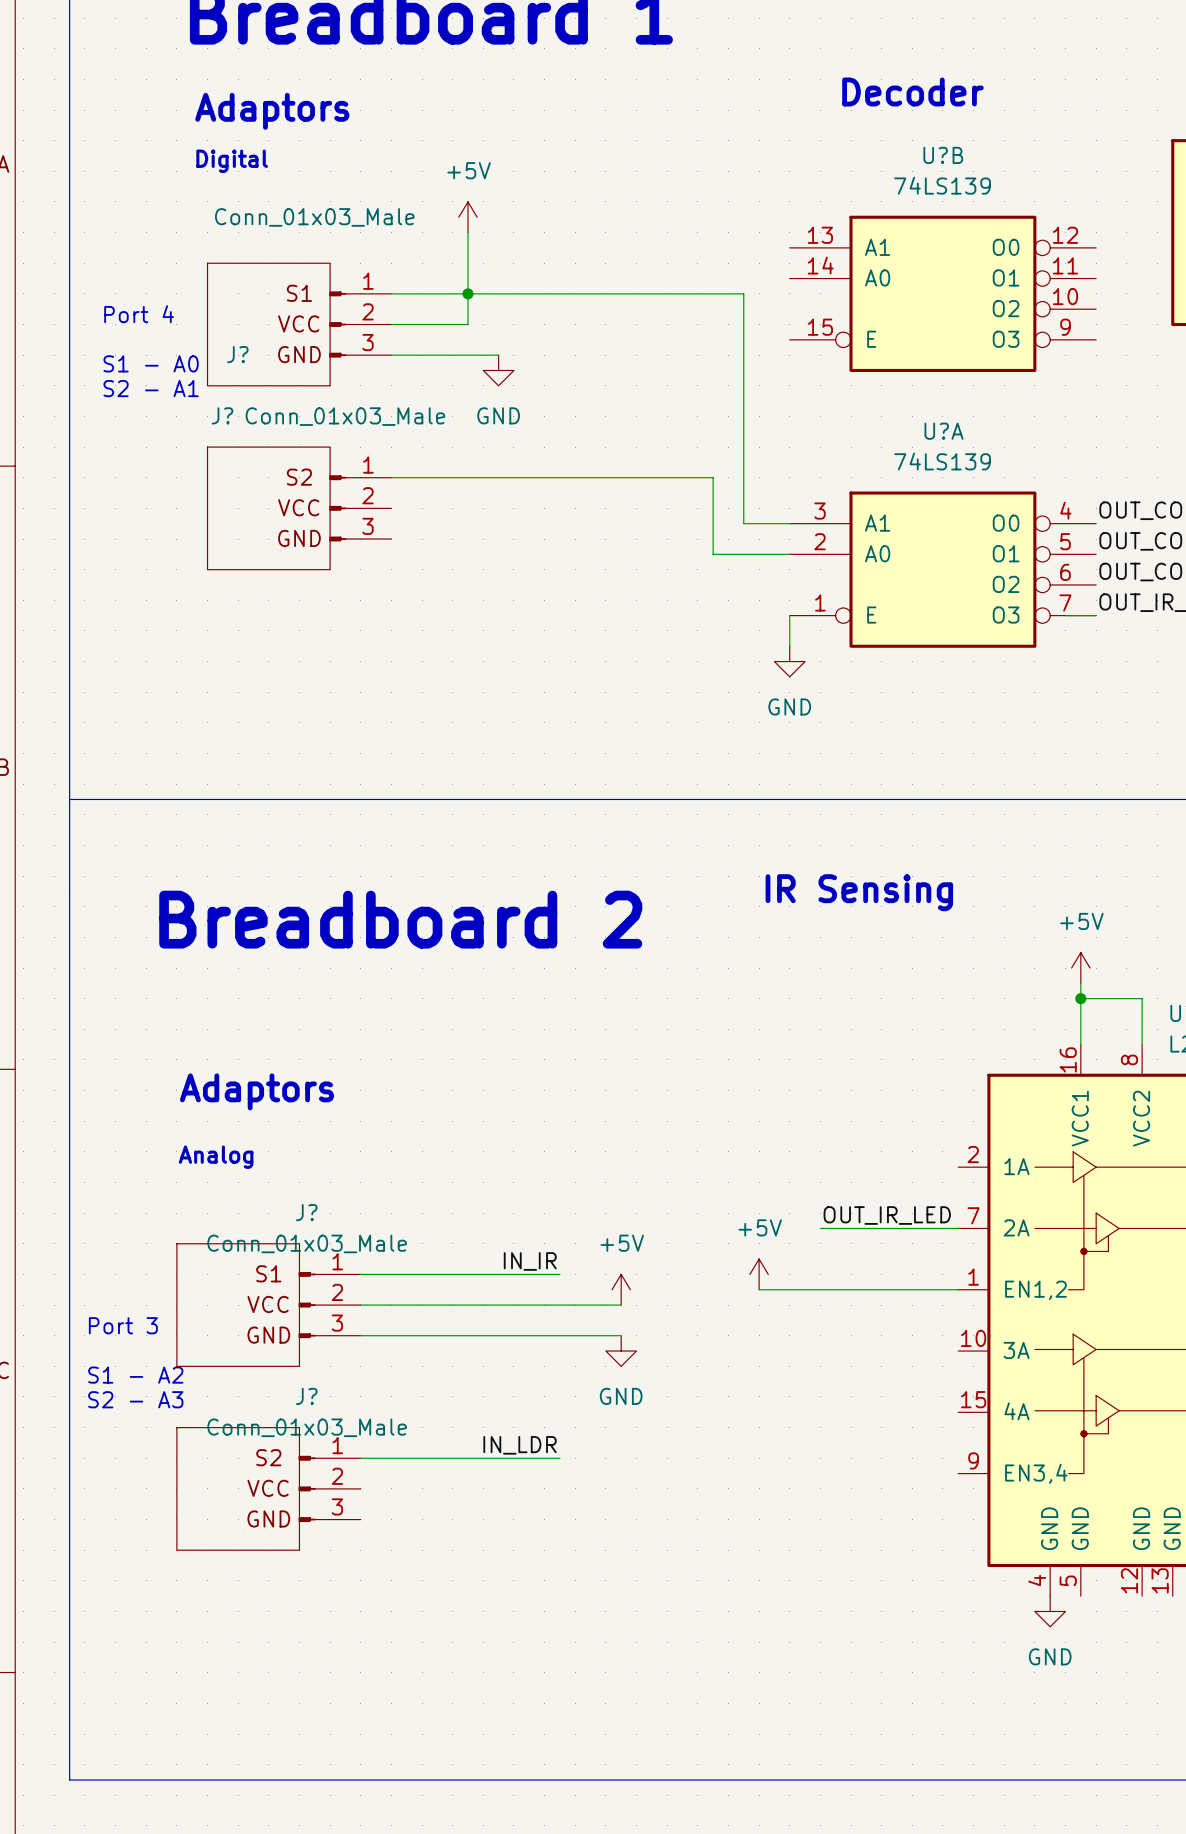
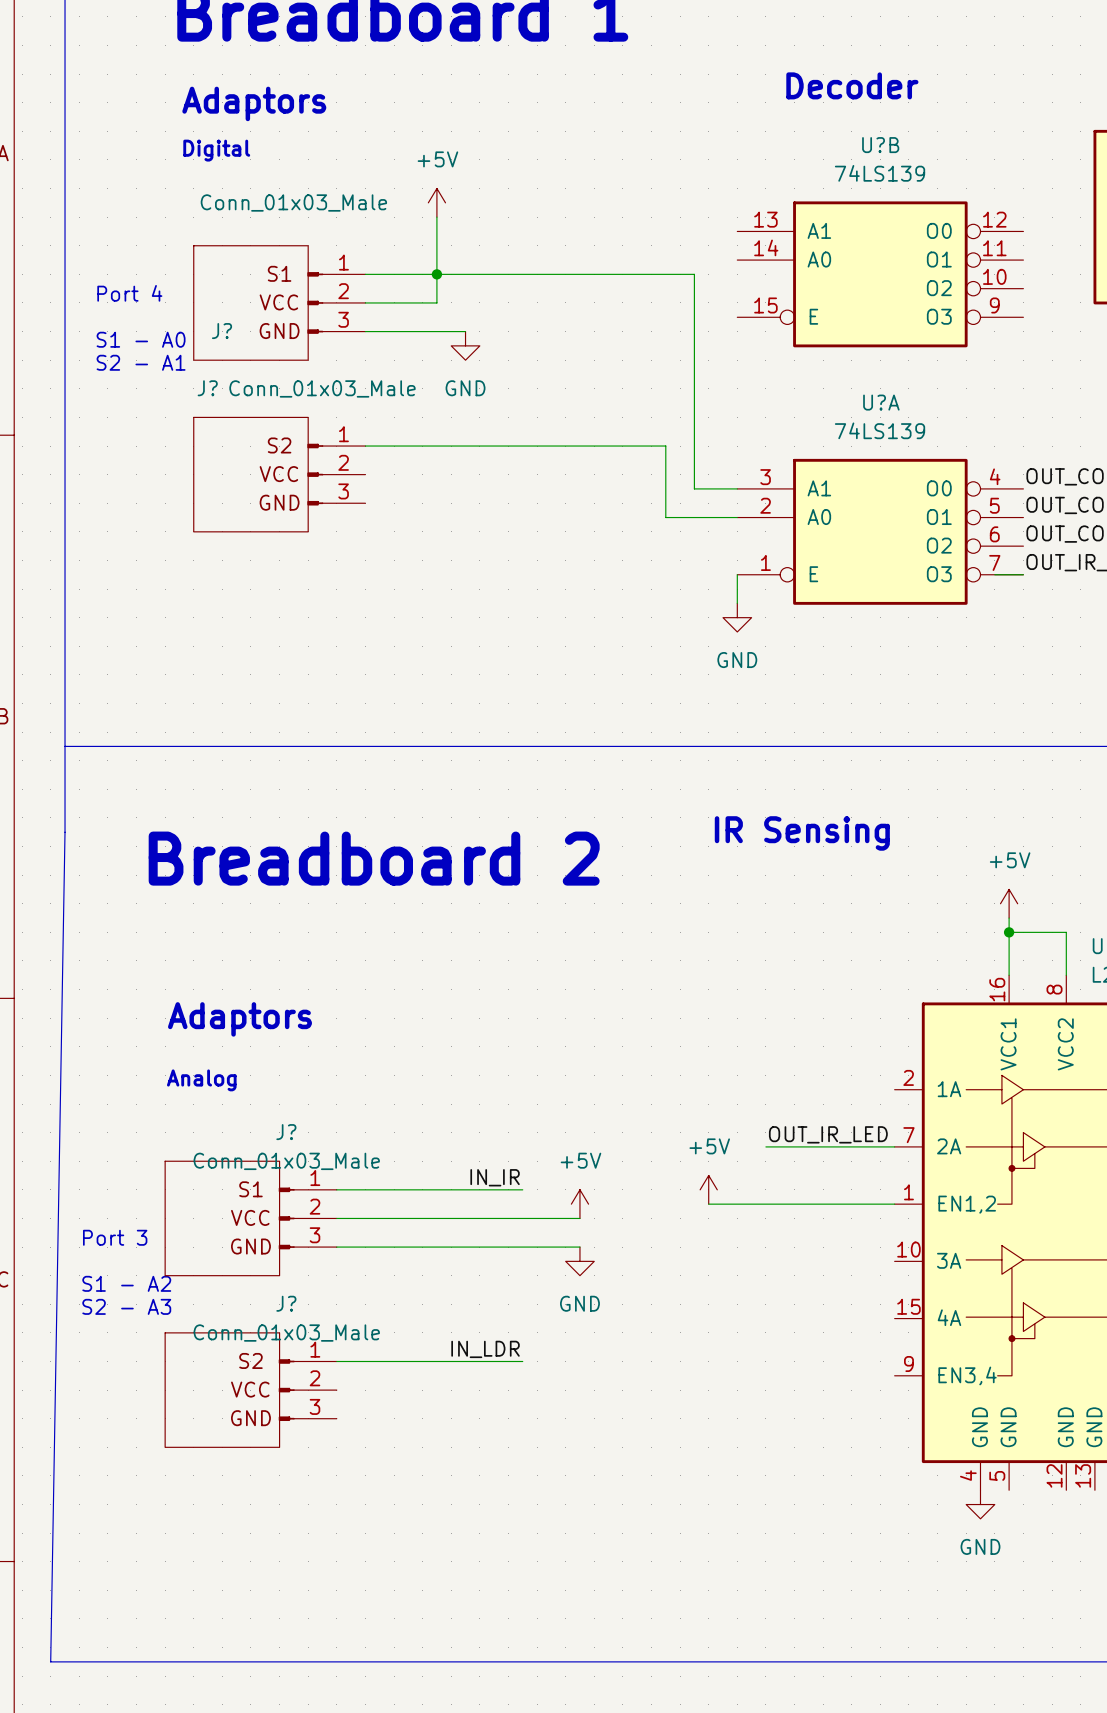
line: (69, 891) (69, 1780) -> (65, 832) (50, 1661) (65, 1661)

